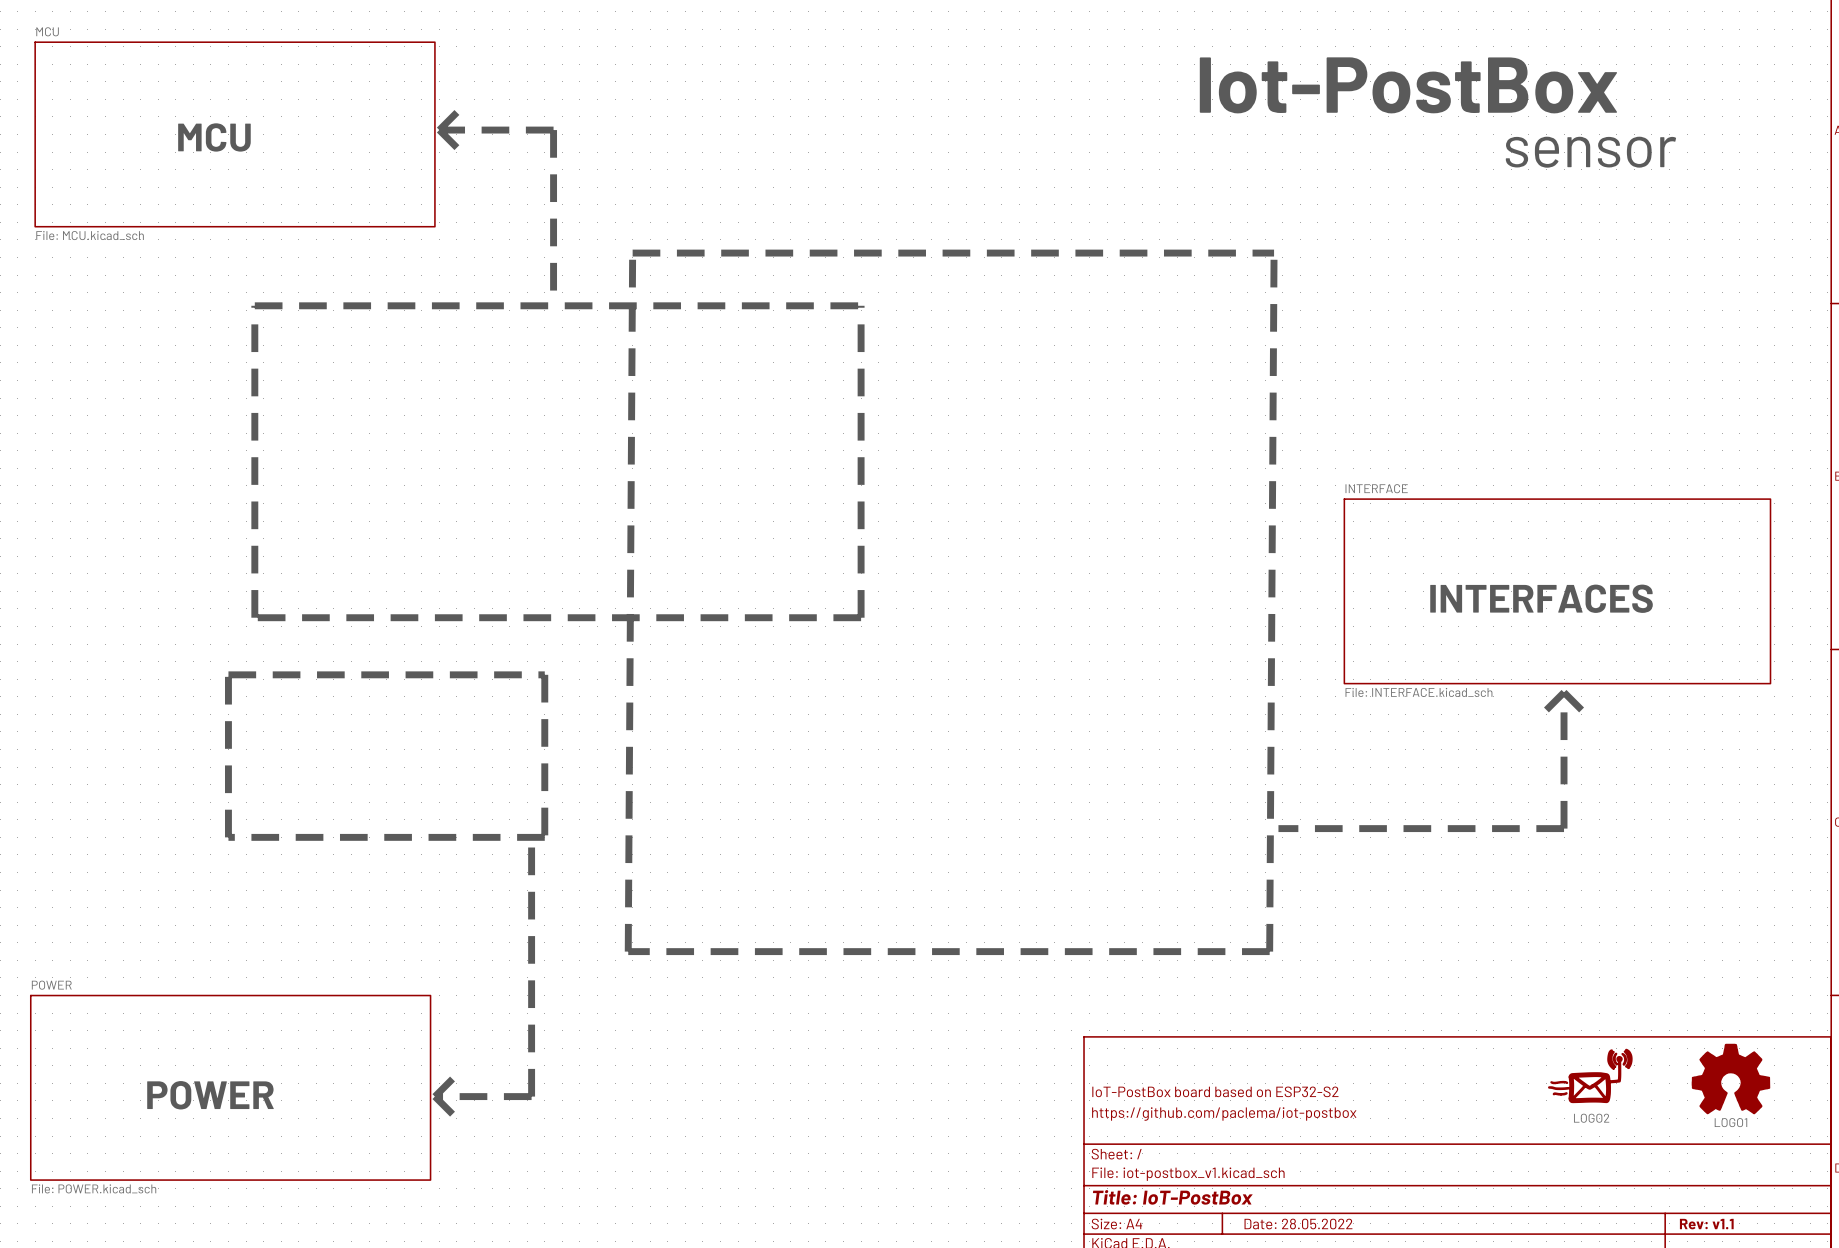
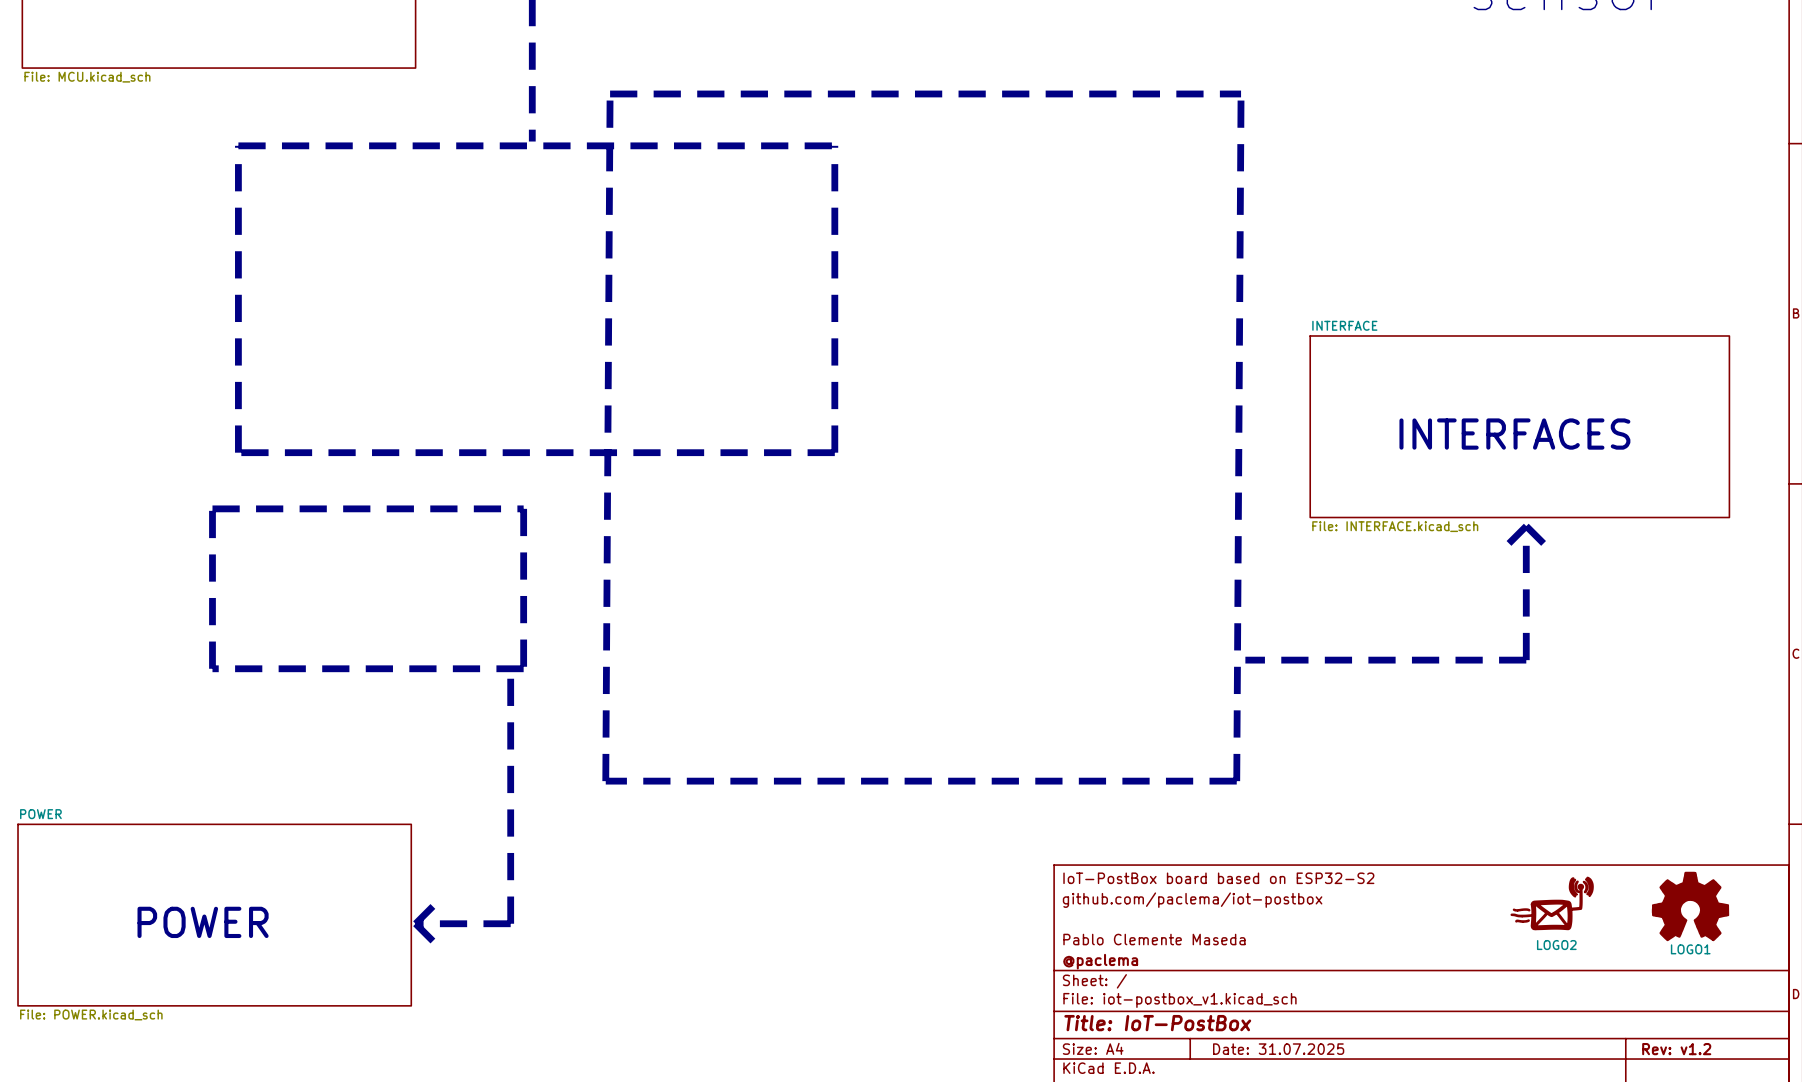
title block: none -> github.com/paclema/iot-postbox (1192, 900)
title block position: IoT-PostBox board based on ESP32-S2 (1215, 1091) -> IoT-PostBox board based on ESP32-S2 (1218, 878)
title block: https://github.com/paclema/iot-postbox (1224, 1114) -> Pablo Clemente Maseda (1154, 939)
title block: none -> @paclema (1100, 961)
title block: Date: 28.05.2022 (1298, 1224) -> Date: 31.07.2025 (1278, 1049)
title block: Rev: v1.1 (1706, 1224) -> Rev: v1.2 (1676, 1049)

